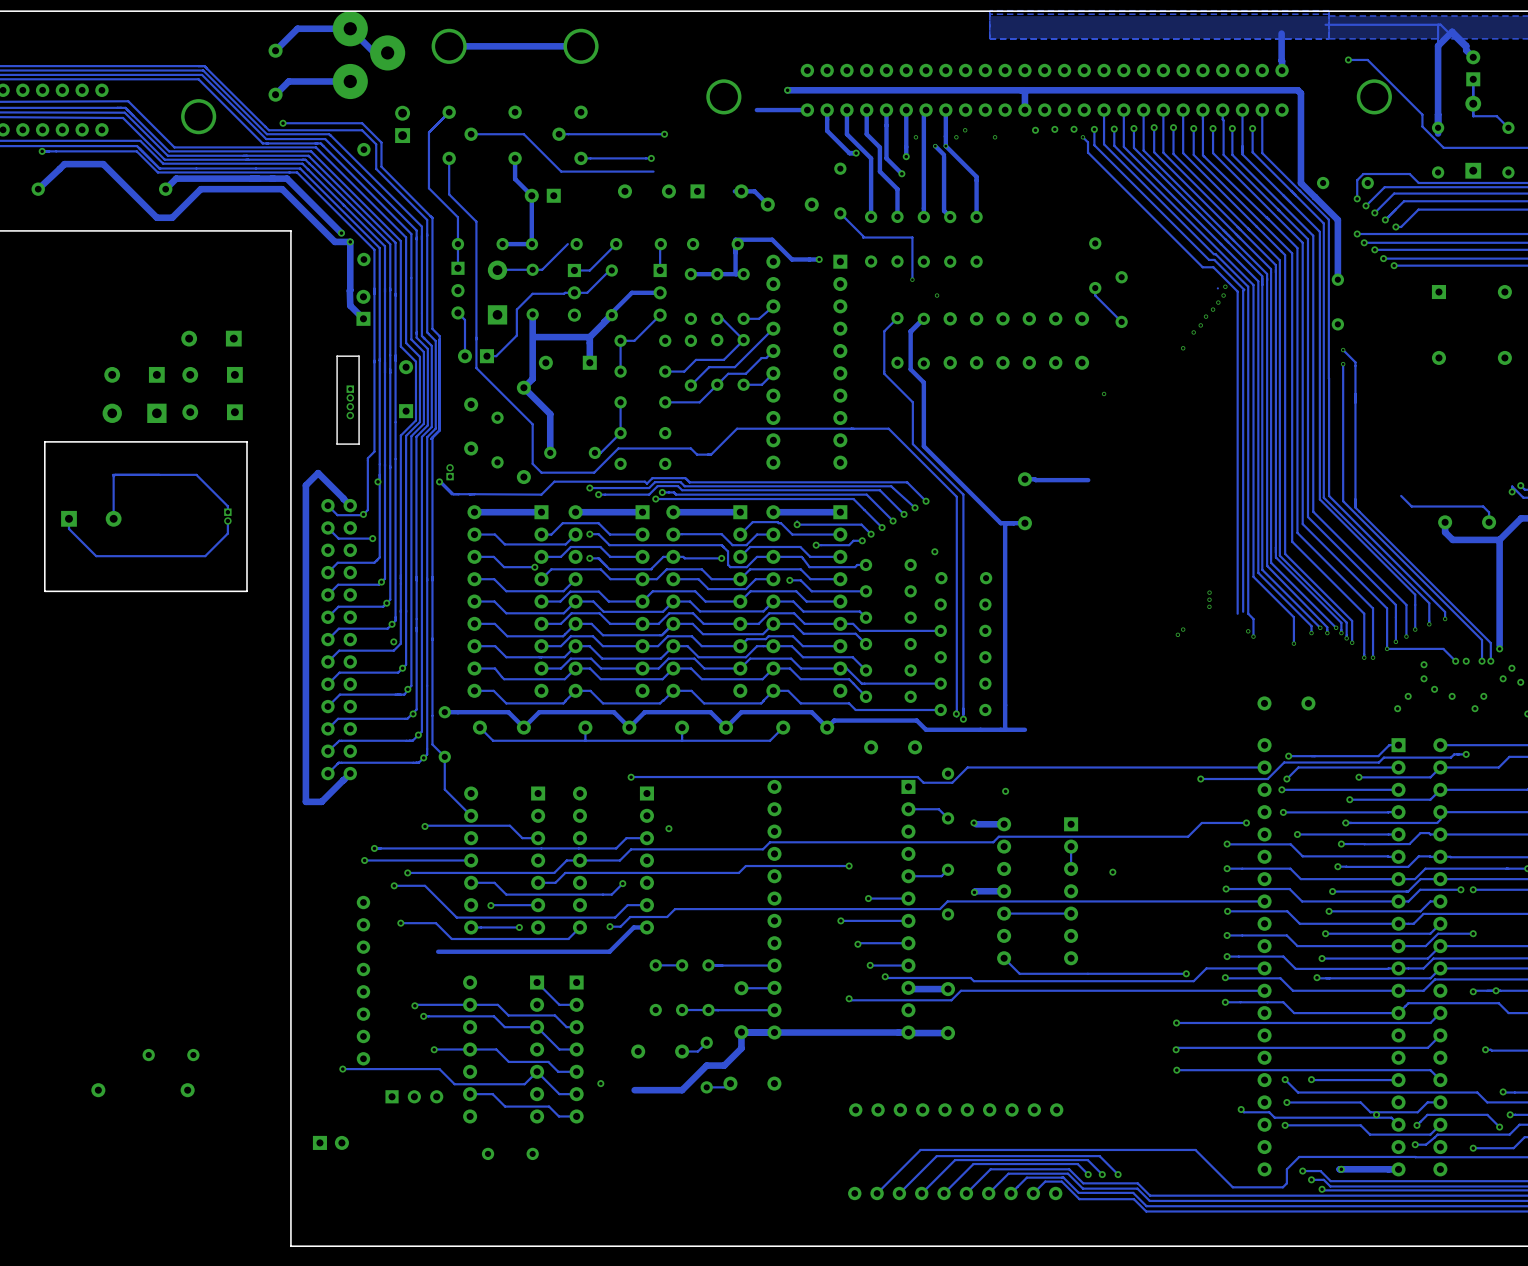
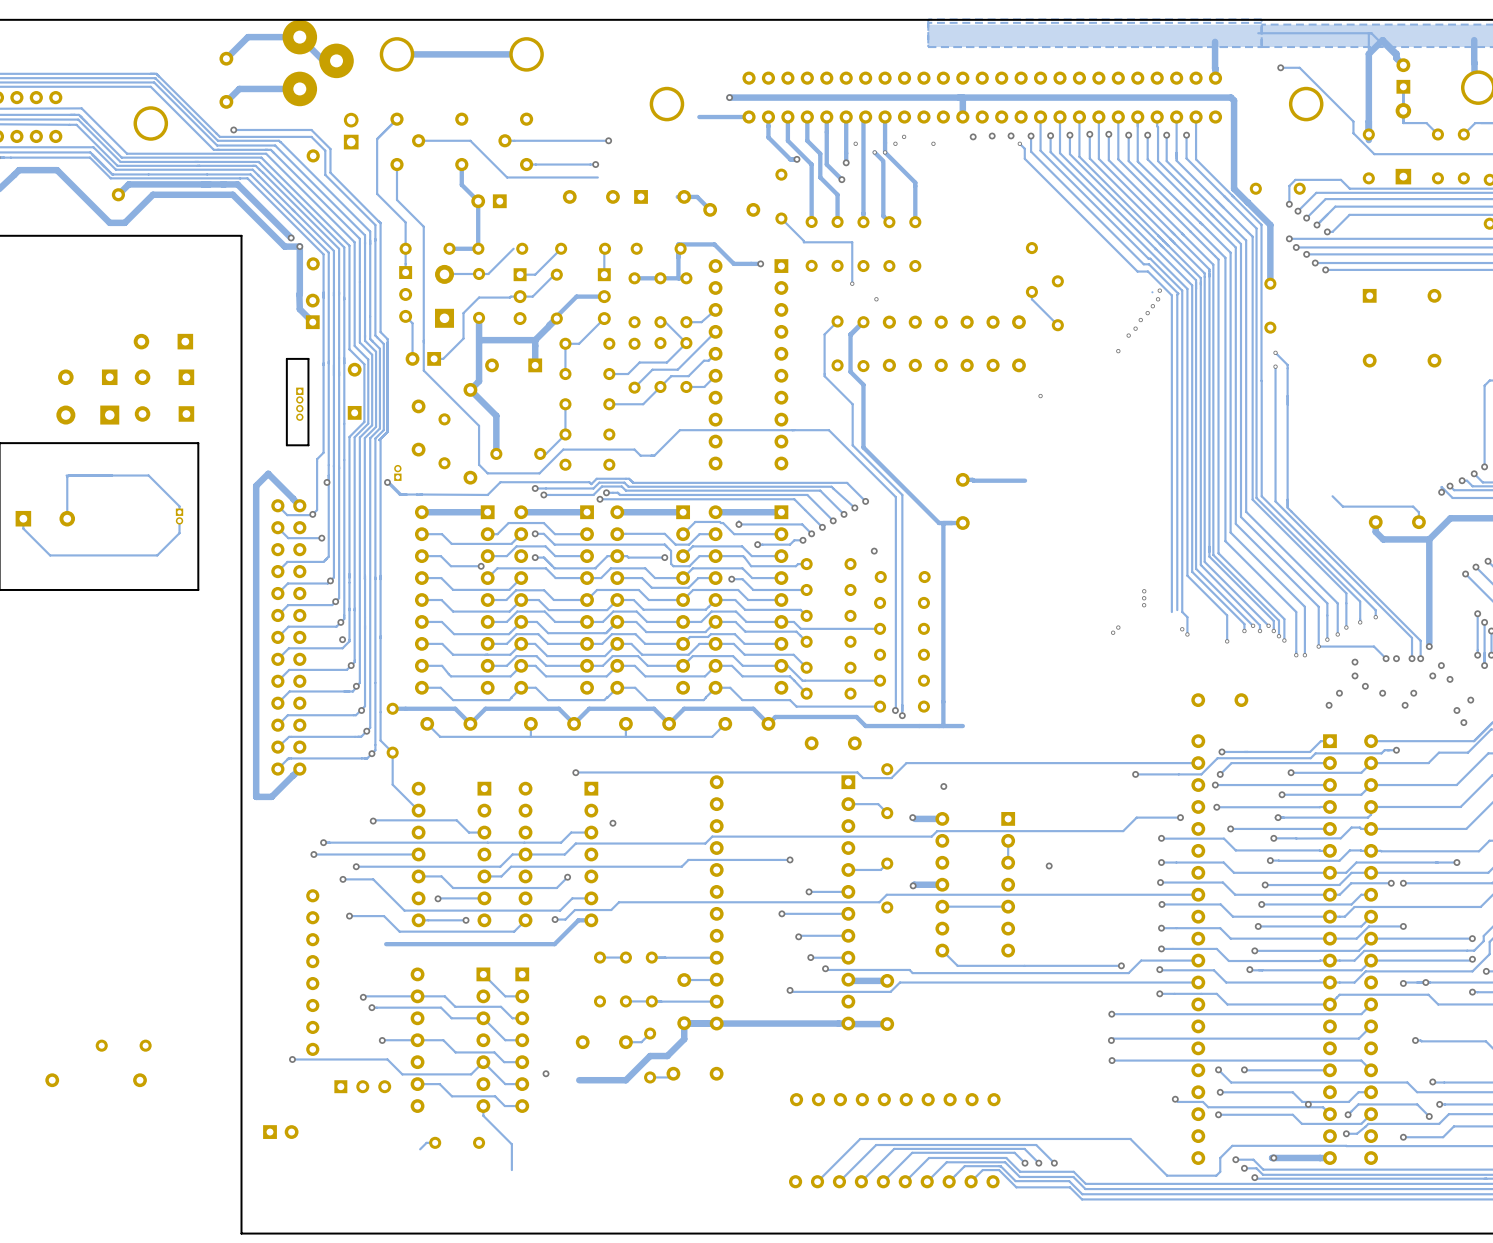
track: none -> (483, 1106) (483, 1115) (511, 1144) (511, 1170)
track: none -> (435, 1142) (426, 1142) (420, 1149)

